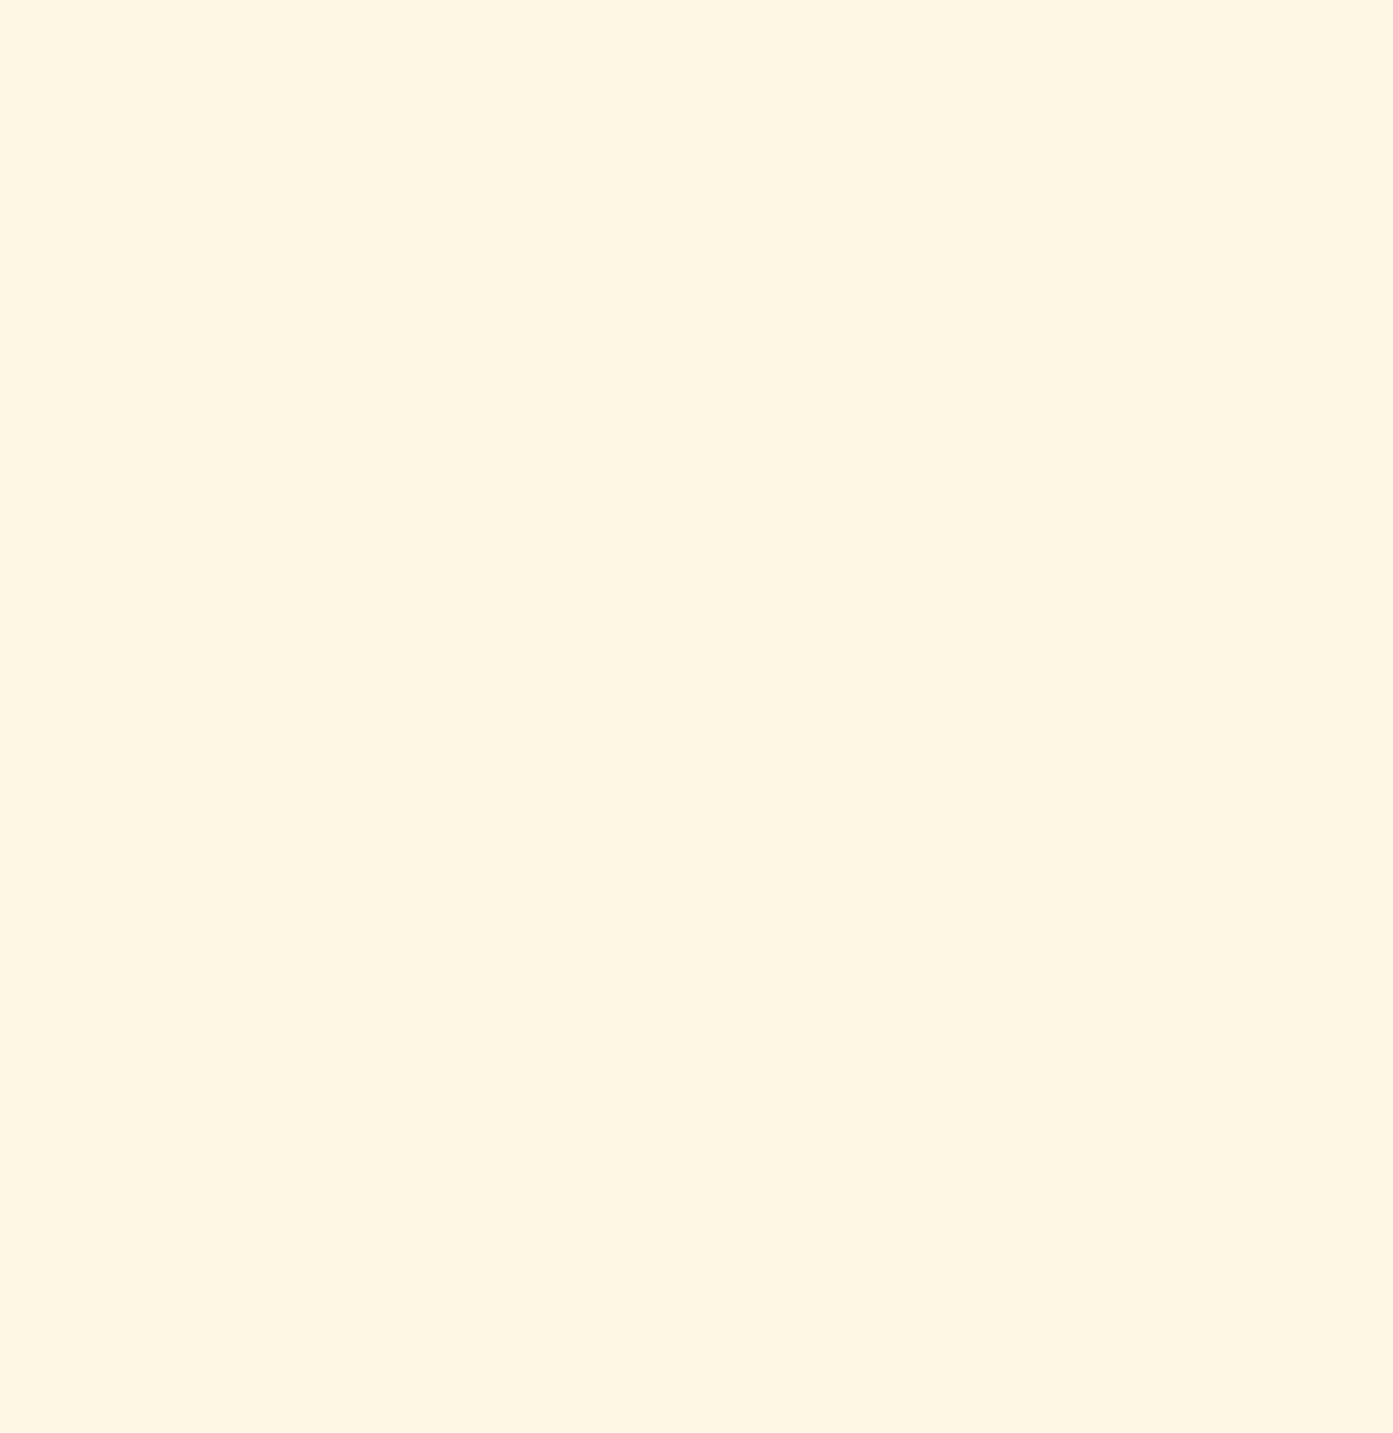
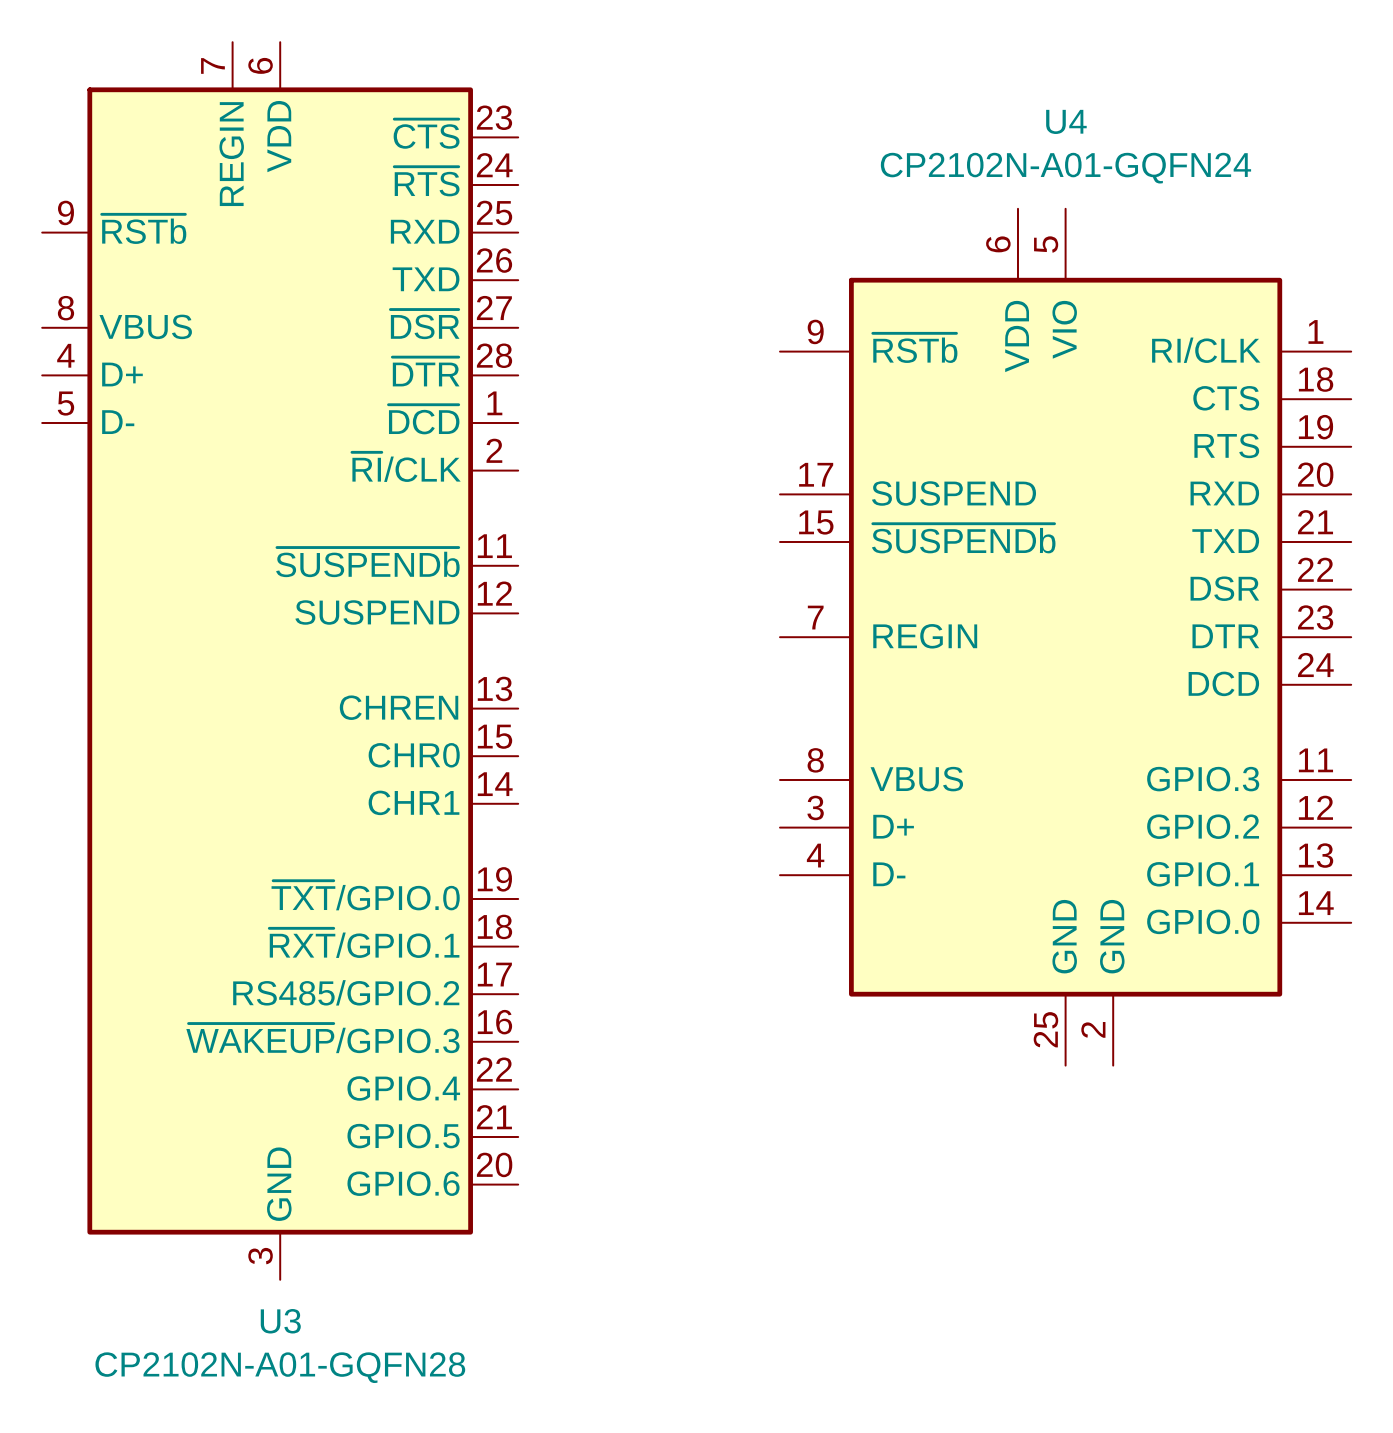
U4: none -> CP2102N-A01-GQFN24 (1065, 637)
U3: none -> CP2102N-A01-GQFN28 (280, 660)

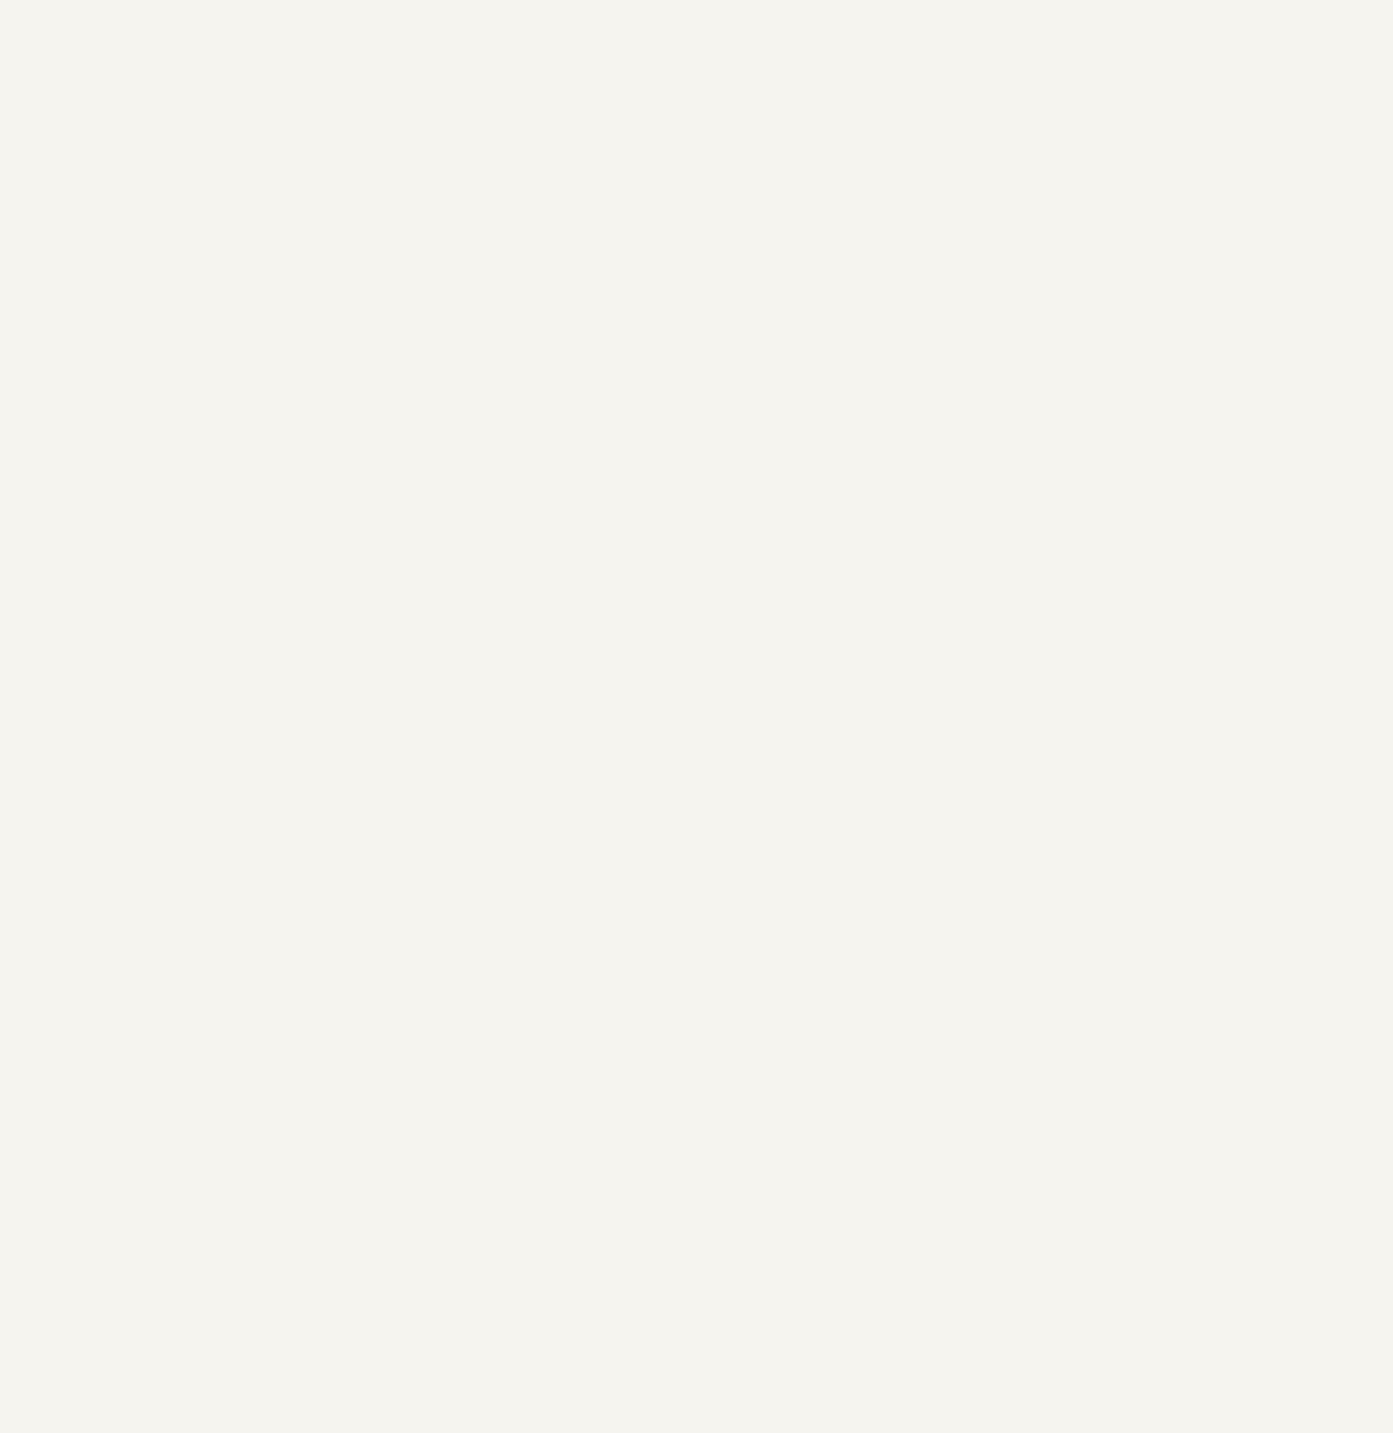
U4: CP2102N-A01-GQFN24 (1065, 637) -> none
U3: CP2102N-A01-GQFN28 (280, 660) -> none

